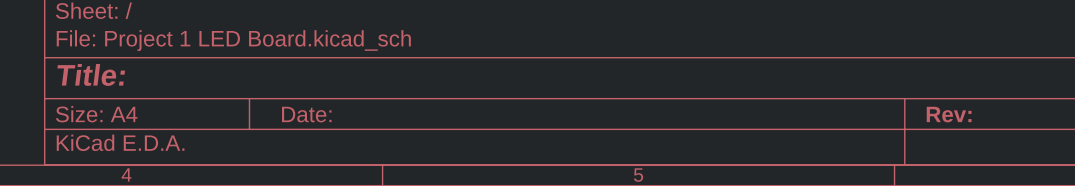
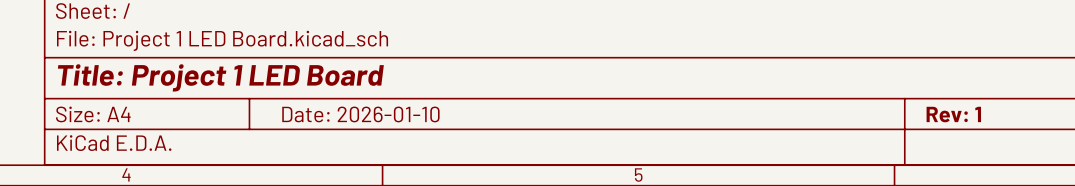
title block: Title: (91, 74) -> Title: Project 1 LED Board (220, 77)
title block: Date: (306, 114) -> Date: 2026-01-10 (360, 114)
title block: Rev: (949, 114) -> Rev: 1 (953, 114)

